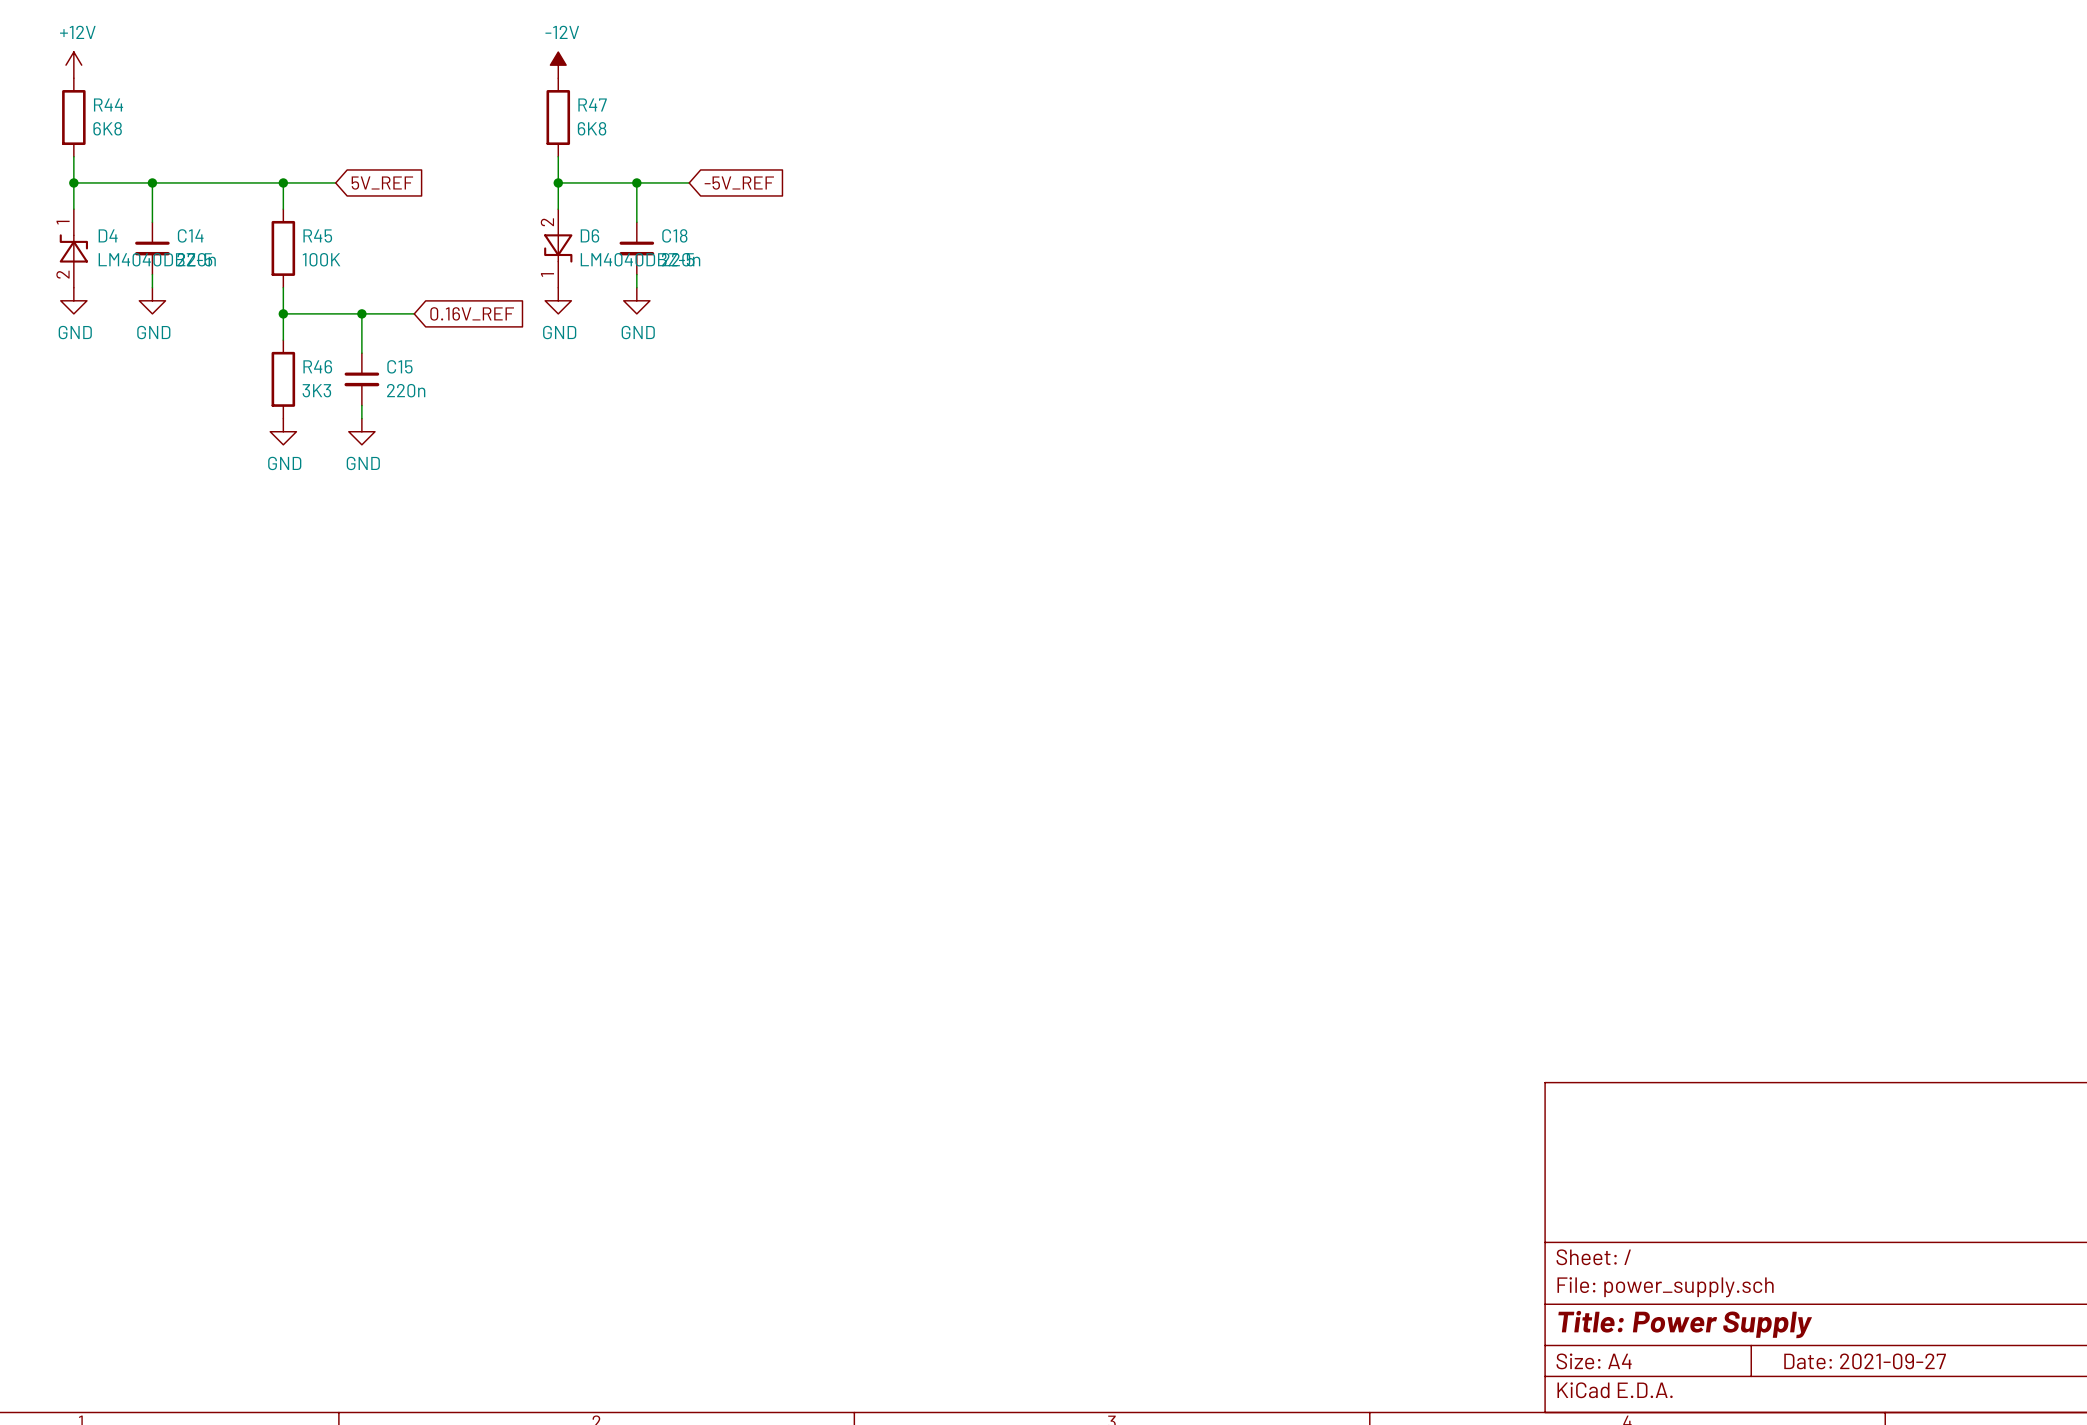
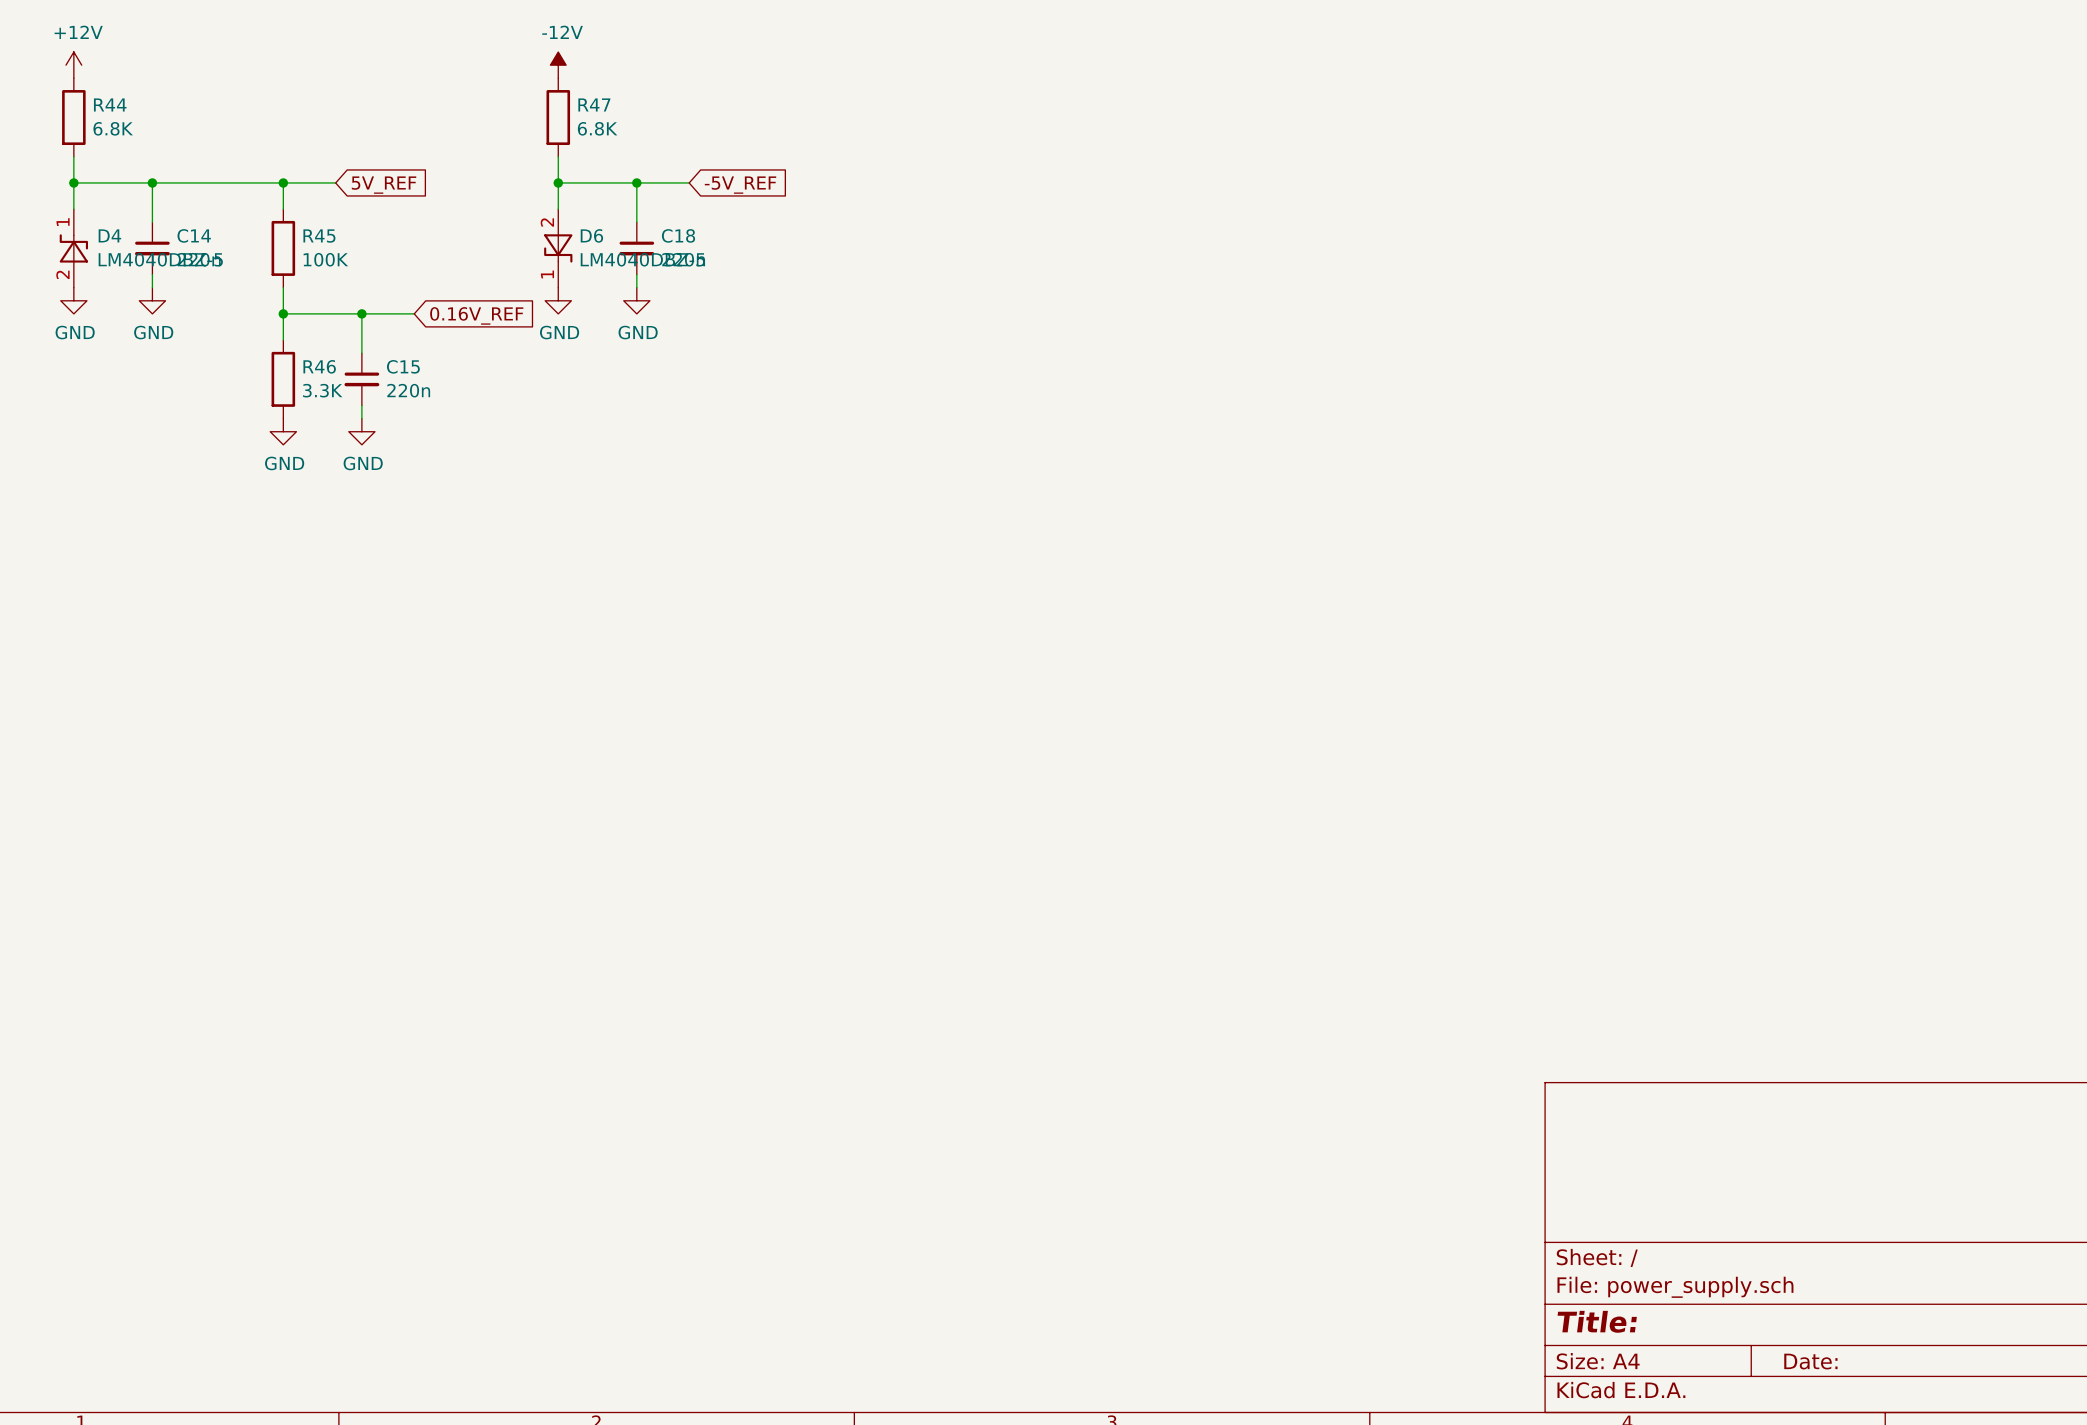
R44 value: 6K8 (107, 128) -> 6.8K (113, 128)
R47 value: 6K8 (592, 128) -> 6.8K (597, 128)
R46 value: 3K3 (316, 390) -> 3.3K (322, 390)
title block: Title: Power Supply (1685, 1324) -> Title: (1597, 1321)
title block: Date: 2021-09-27 (1865, 1361) -> Date: (1810, 1361)

